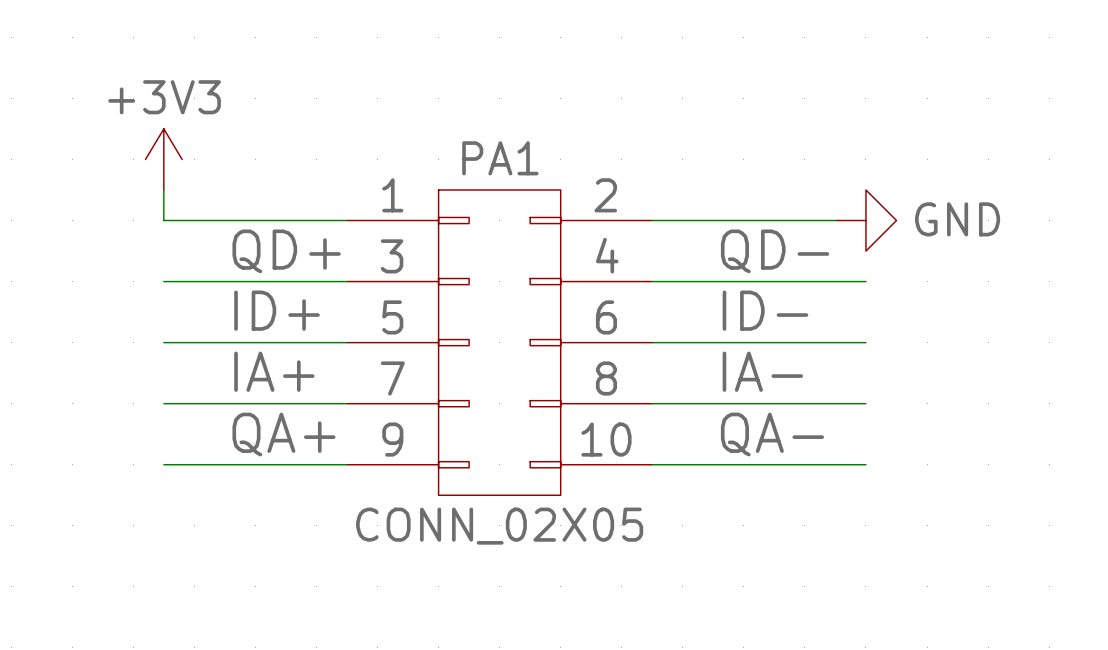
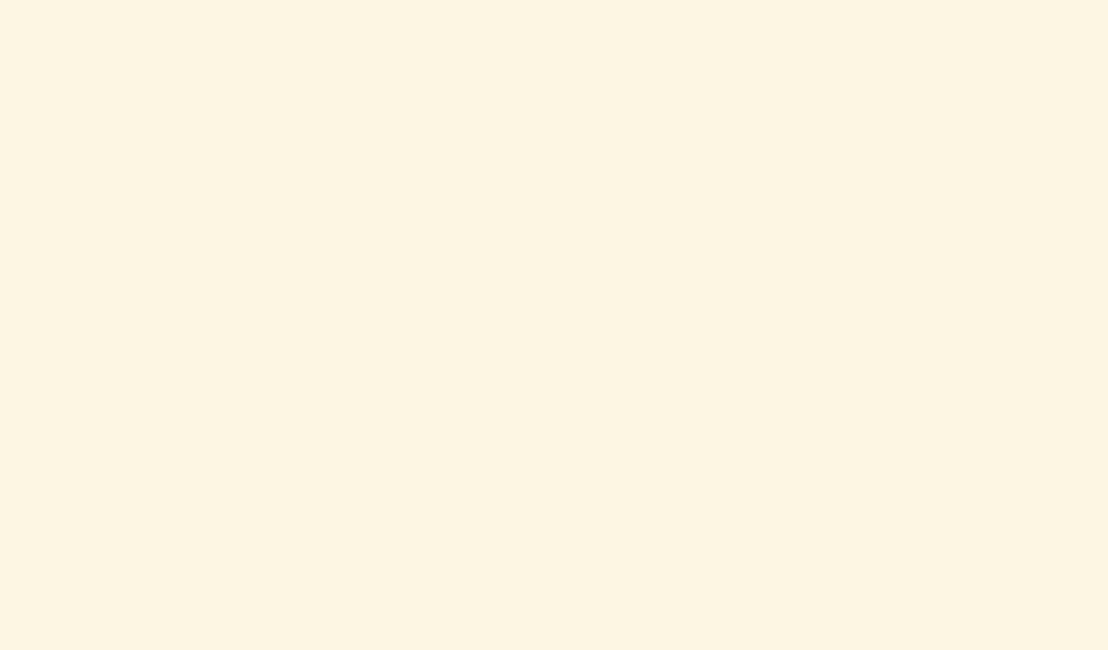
power symbol: +3V3 (163, 159) -> none
wire: (163, 189) (163, 220) (347, 220) -> none
wire: (652, 220) (835, 220) -> none
power symbol: GND (865, 220) -> none
label: QD+ (286, 251) -> none
label: QD- (775, 251) -> none
wire: (163, 281) (347, 281) -> none
wire: (652, 281) (865, 281) -> none
label: ID+ (277, 310) -> none
label: ID- (765, 310) -> none
wire: (163, 342) (347, 342) -> none
PA1: CONN_02X05 (499, 342) -> none
wire: (652, 342) (865, 342) -> none
label: IA+ (274, 371) -> none
label: IA- (762, 371) -> none
wire: (163, 403) (347, 403) -> none
wire: (652, 403) (865, 403) -> none
label: QA+ (283, 434) -> none
label: QA- (772, 434) -> none
wire: (163, 464) (347, 464) -> none
wire: (652, 464) (865, 464) -> none

